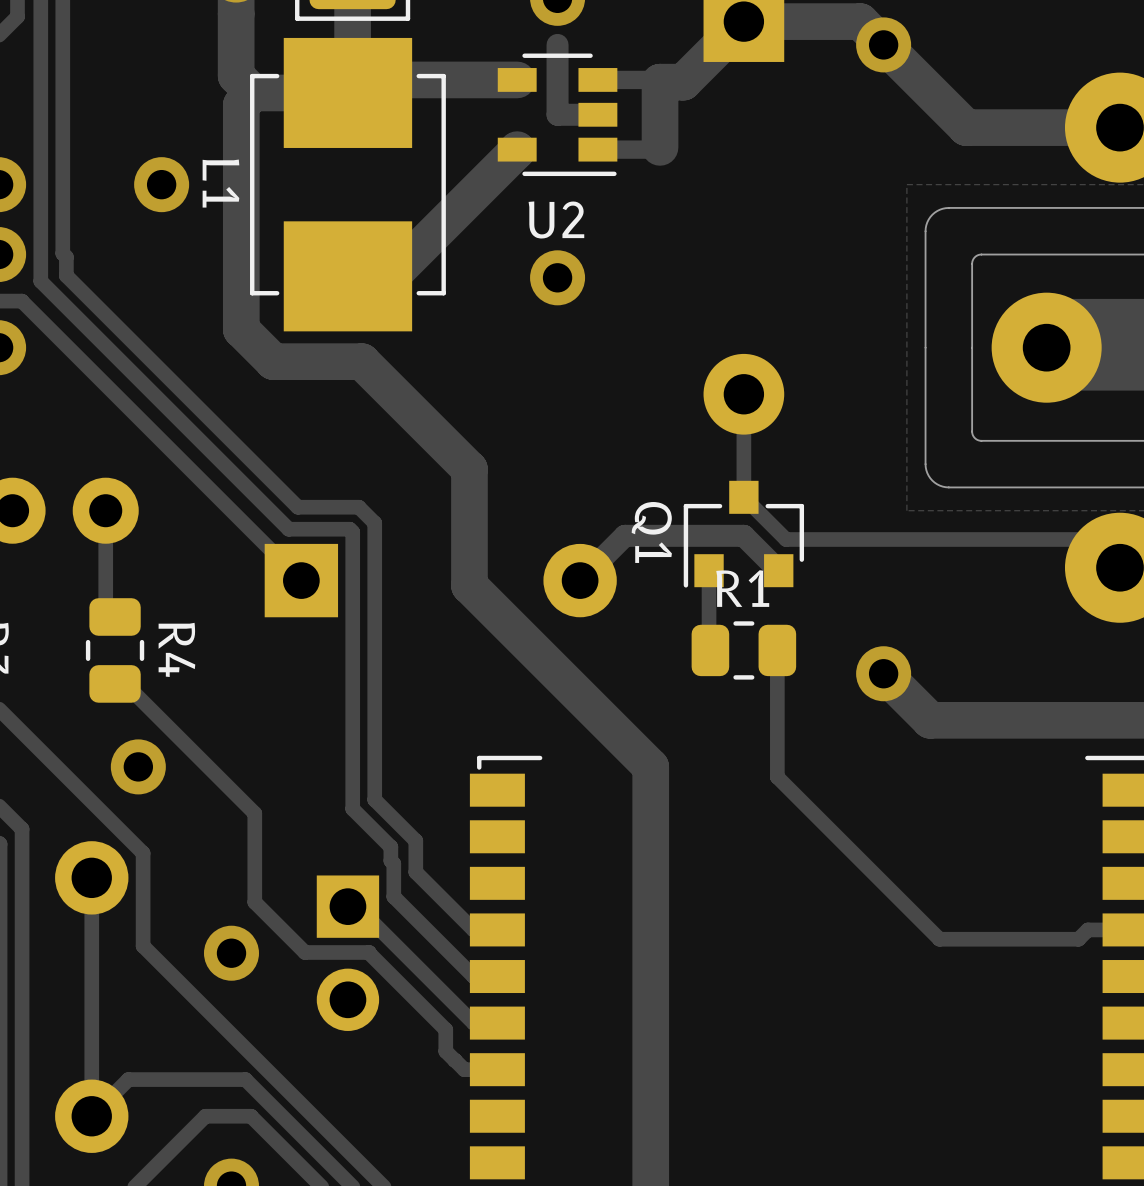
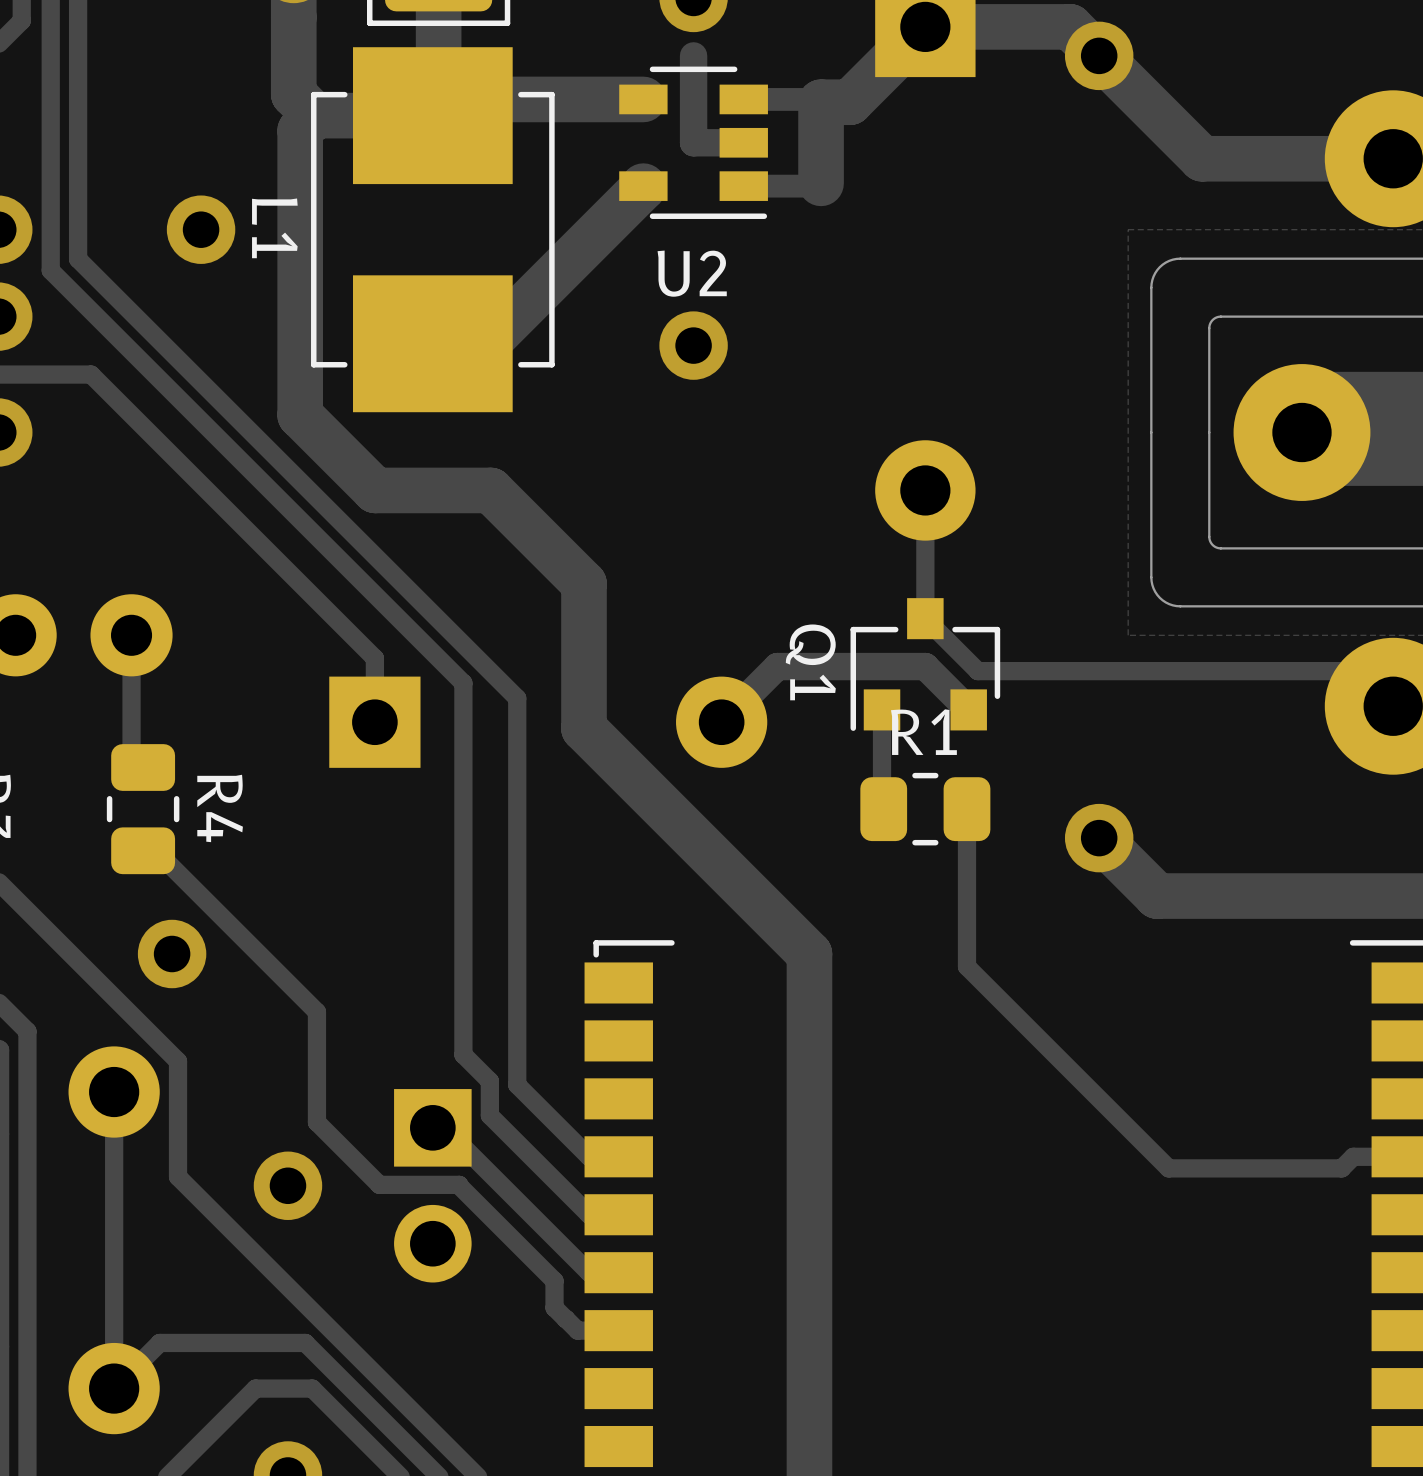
track: (62, 208) (62, 253) (66, 257) (66, 275) (297, 507) (358, 507) (374, 523) (374, 799) (415, 840) -> (78, 259) (517, 698) (517, 1046)
track: (40, 217) (40, 281) (288, 529) (349, 529) (352, 532) (352, 808) (390, 847) (390, 860) (393, 863) (393, 869) -> (50, 270) (463, 683) (463, 1054) (489, 1081)
track: (21, 301) (301, 580) -> (27, 374) (91, 374) (374, 658) (374, 722)
track: (241, 329) (273, 361) (361, 361) (394, 394) -> (300, 409) (300, 415) (375, 490) (490, 490)

